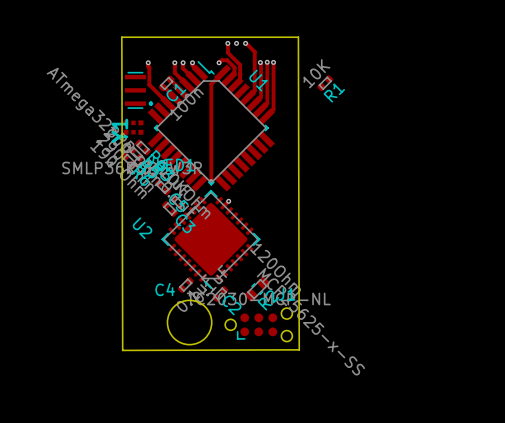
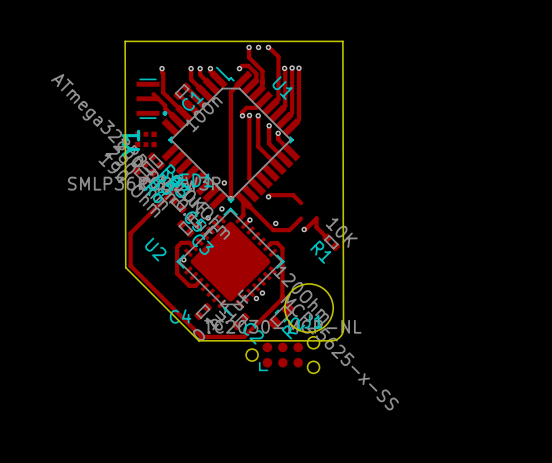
board edge: (121, 37) (122, 350) (299, 349) (298, 37) (121, 37) -> (125, 41) (125, 267) (198, 340) (331, 340) (338, 338) (343, 328) (342, 41) (125, 41)
R1 rotation: 0° (325, 83) -> 90° clockwise (331, 242)
R1 position: (325, 83) -> (331, 242)
track: none -> (153, 94) (177, 120)
track: none -> (263, 100) (256, 107) (246, 107) (242, 111) (242, 115)
via: none -> (242, 115)
track: none -> (249, 115) (249, 178) (257, 186)
via: none -> (249, 115)
track: none -> (258, 115) (258, 146) (277, 166)
via: none -> (258, 115)
track: none -> (269, 125) (269, 143) (284, 159)
via: none -> (269, 125)
track: none -> (278, 133) (278, 139) (291, 152)
via: none -> (278, 133)
track: none -> (191, 172) (130, 233) (130, 265) (201, 336) (244, 336) (282, 298)
via: none -> (224, 182)
track: none -> (268, 196) (270, 195) (293, 195) (301, 203)
via: none -> (268, 196)
via: none -> (221, 208)
via: none -> (208, 217)
track: none -> (301, 218) (289, 230) (273, 230) (243, 200) (243, 215) (239, 219)
via: none -> (275, 223)
track: none -> (304, 229) (316, 218) (316, 227) (327, 238)
via: none -> (304, 229)
track: none -> (193, 247) (189, 242) (181, 242) (177, 247) (177, 273) (189, 285) (195, 285) (199, 281)
track: none -> (267, 247) (271, 243) (277, 243) (282, 248) (283, 297)
via: none -> (183, 259)
via: none -> (262, 293)
via: none -> (256, 298)
round board edge position: (189, 322) -> (309, 308)

